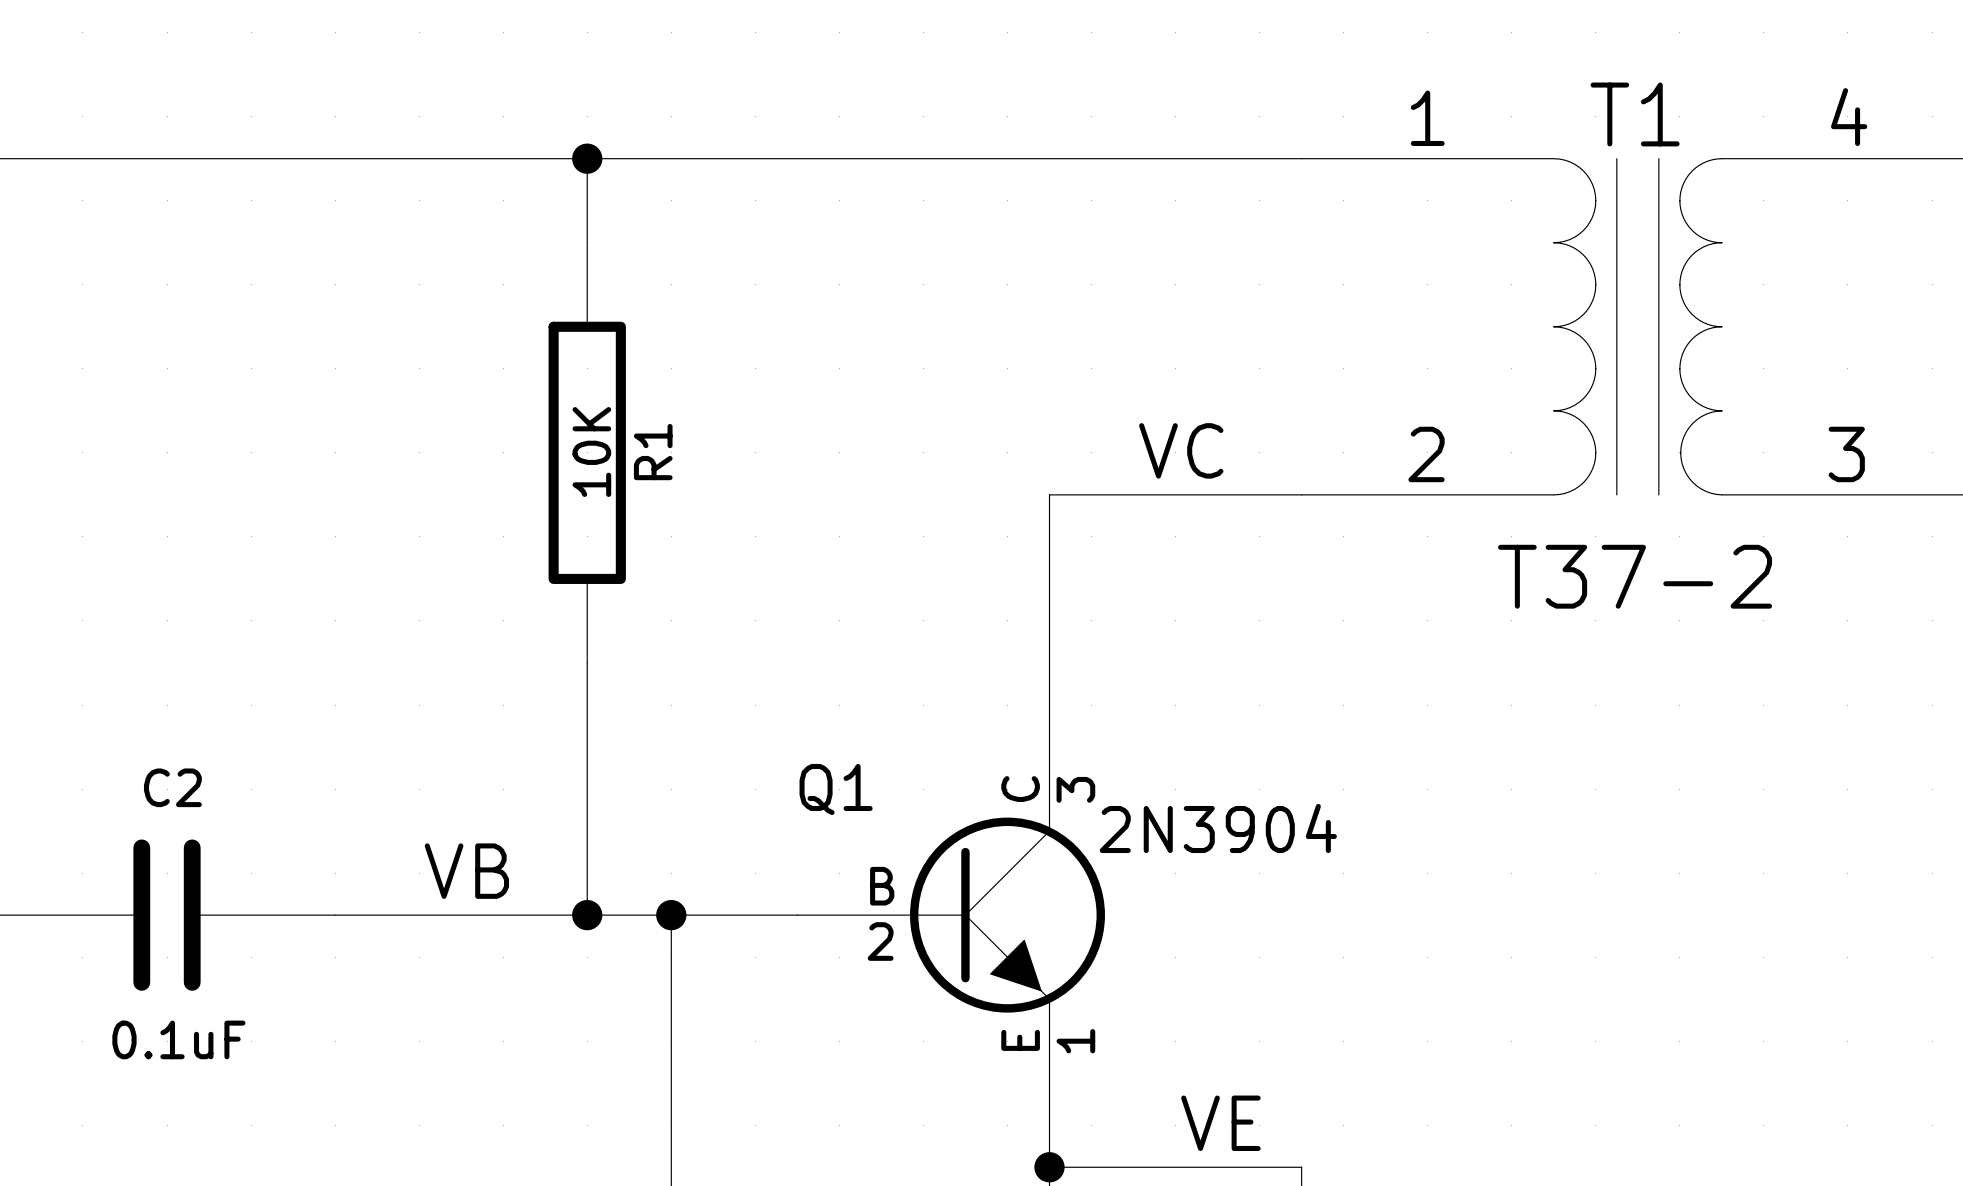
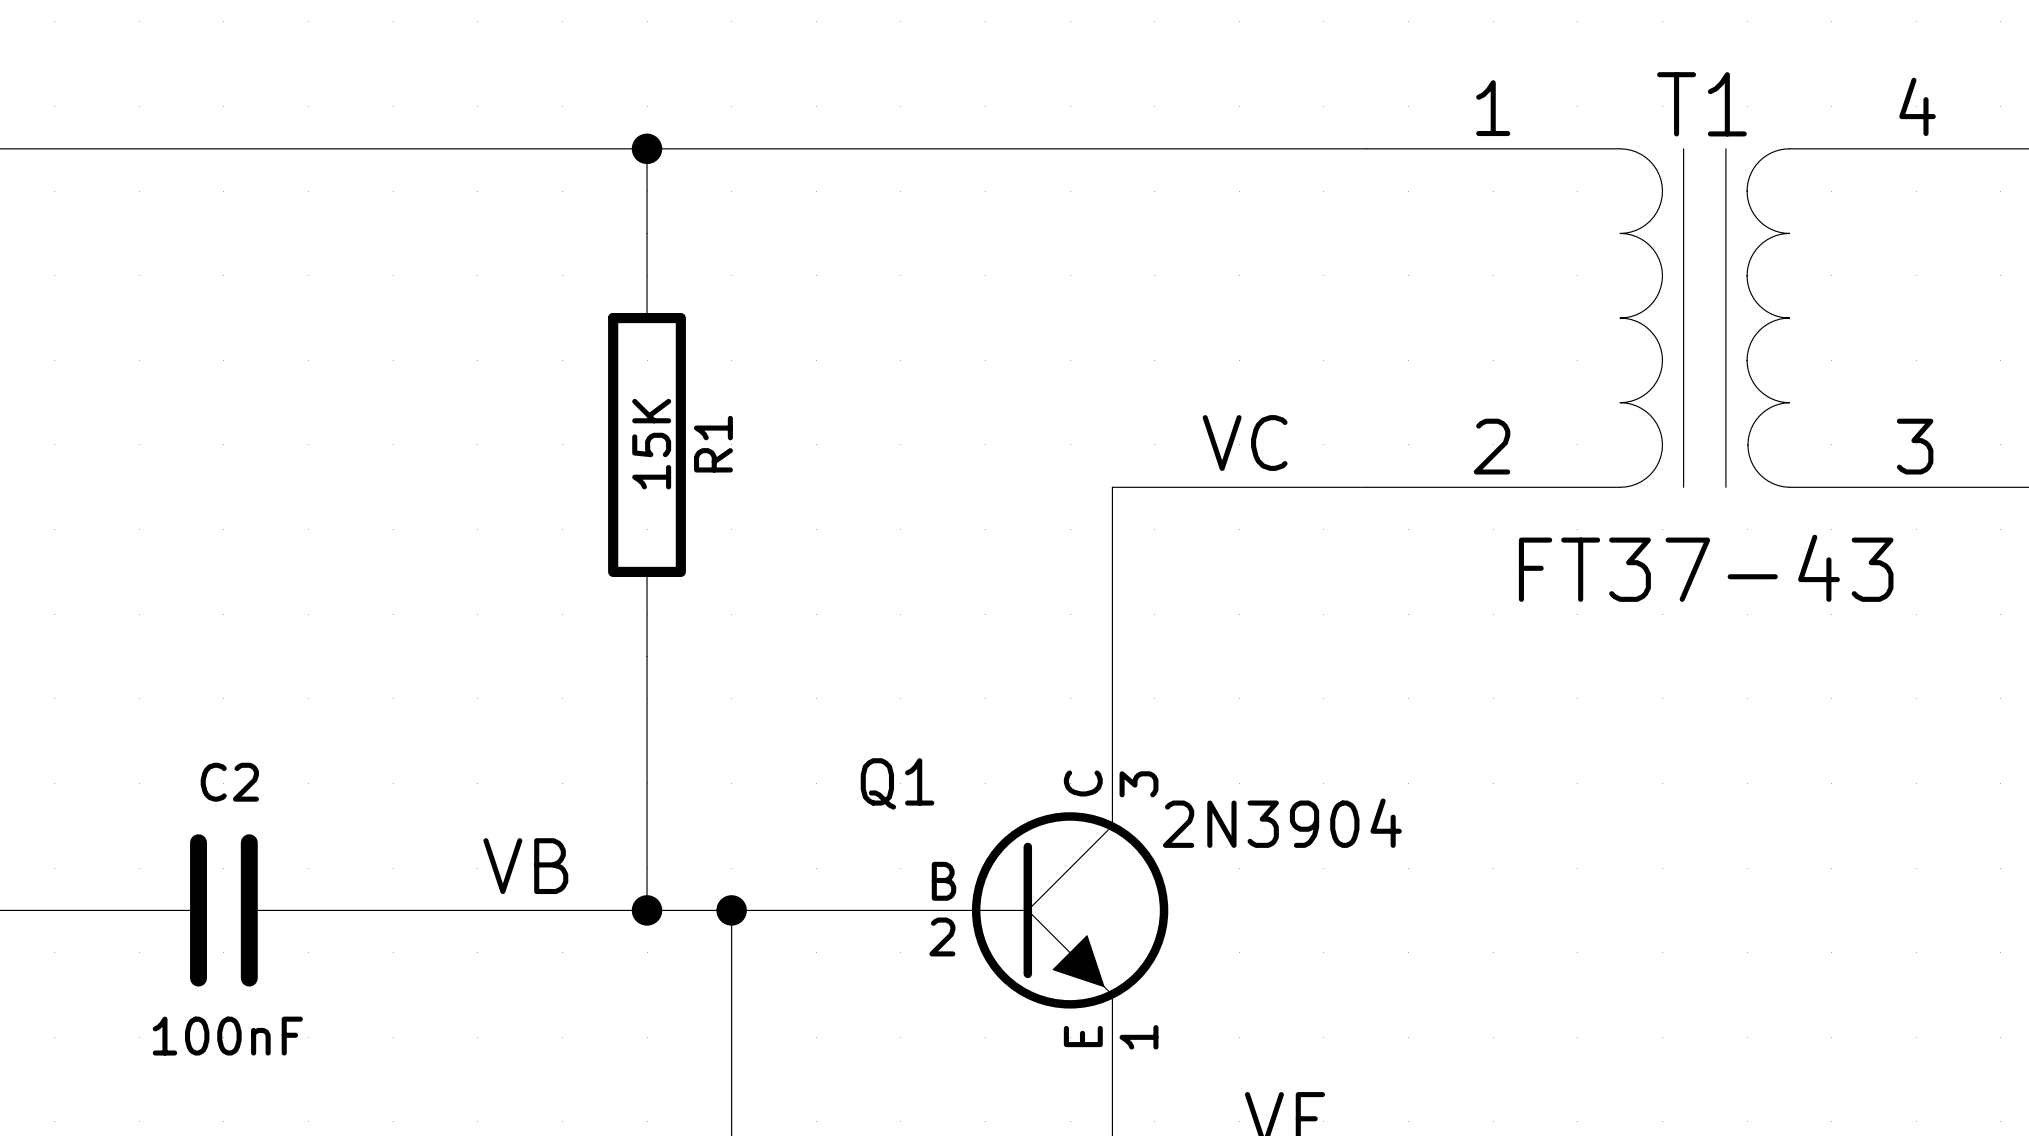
R1 value: 10K (591, 452) -> 15K (651, 444)
T1 value: T37-2 (1635, 576) -> FT37-43 (1706, 568)
C2 value: 0.1uF (178, 1039) -> 100nF (227, 1036)

